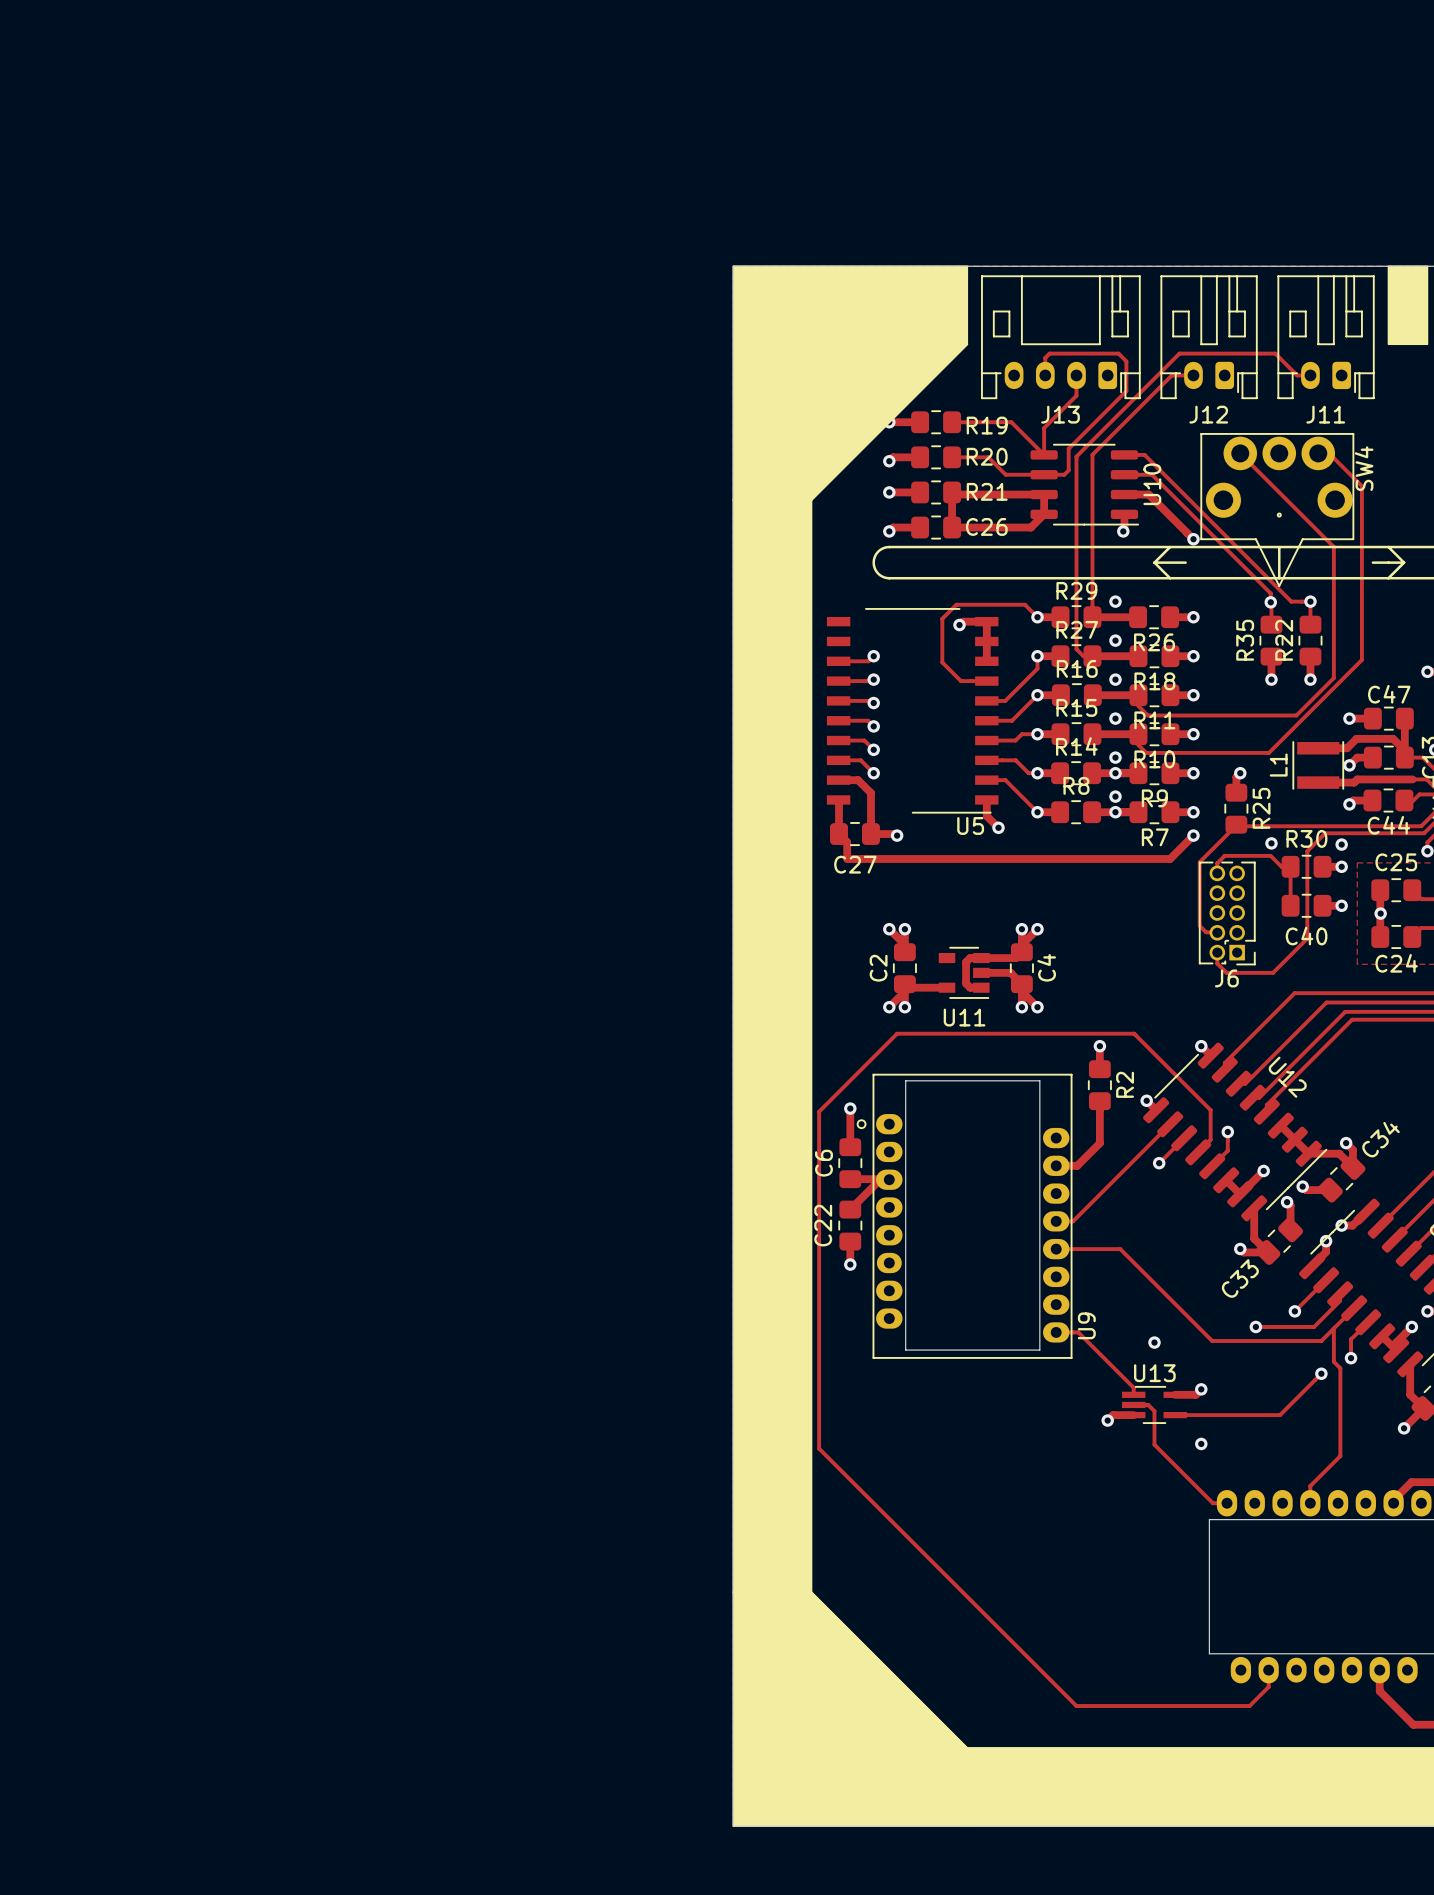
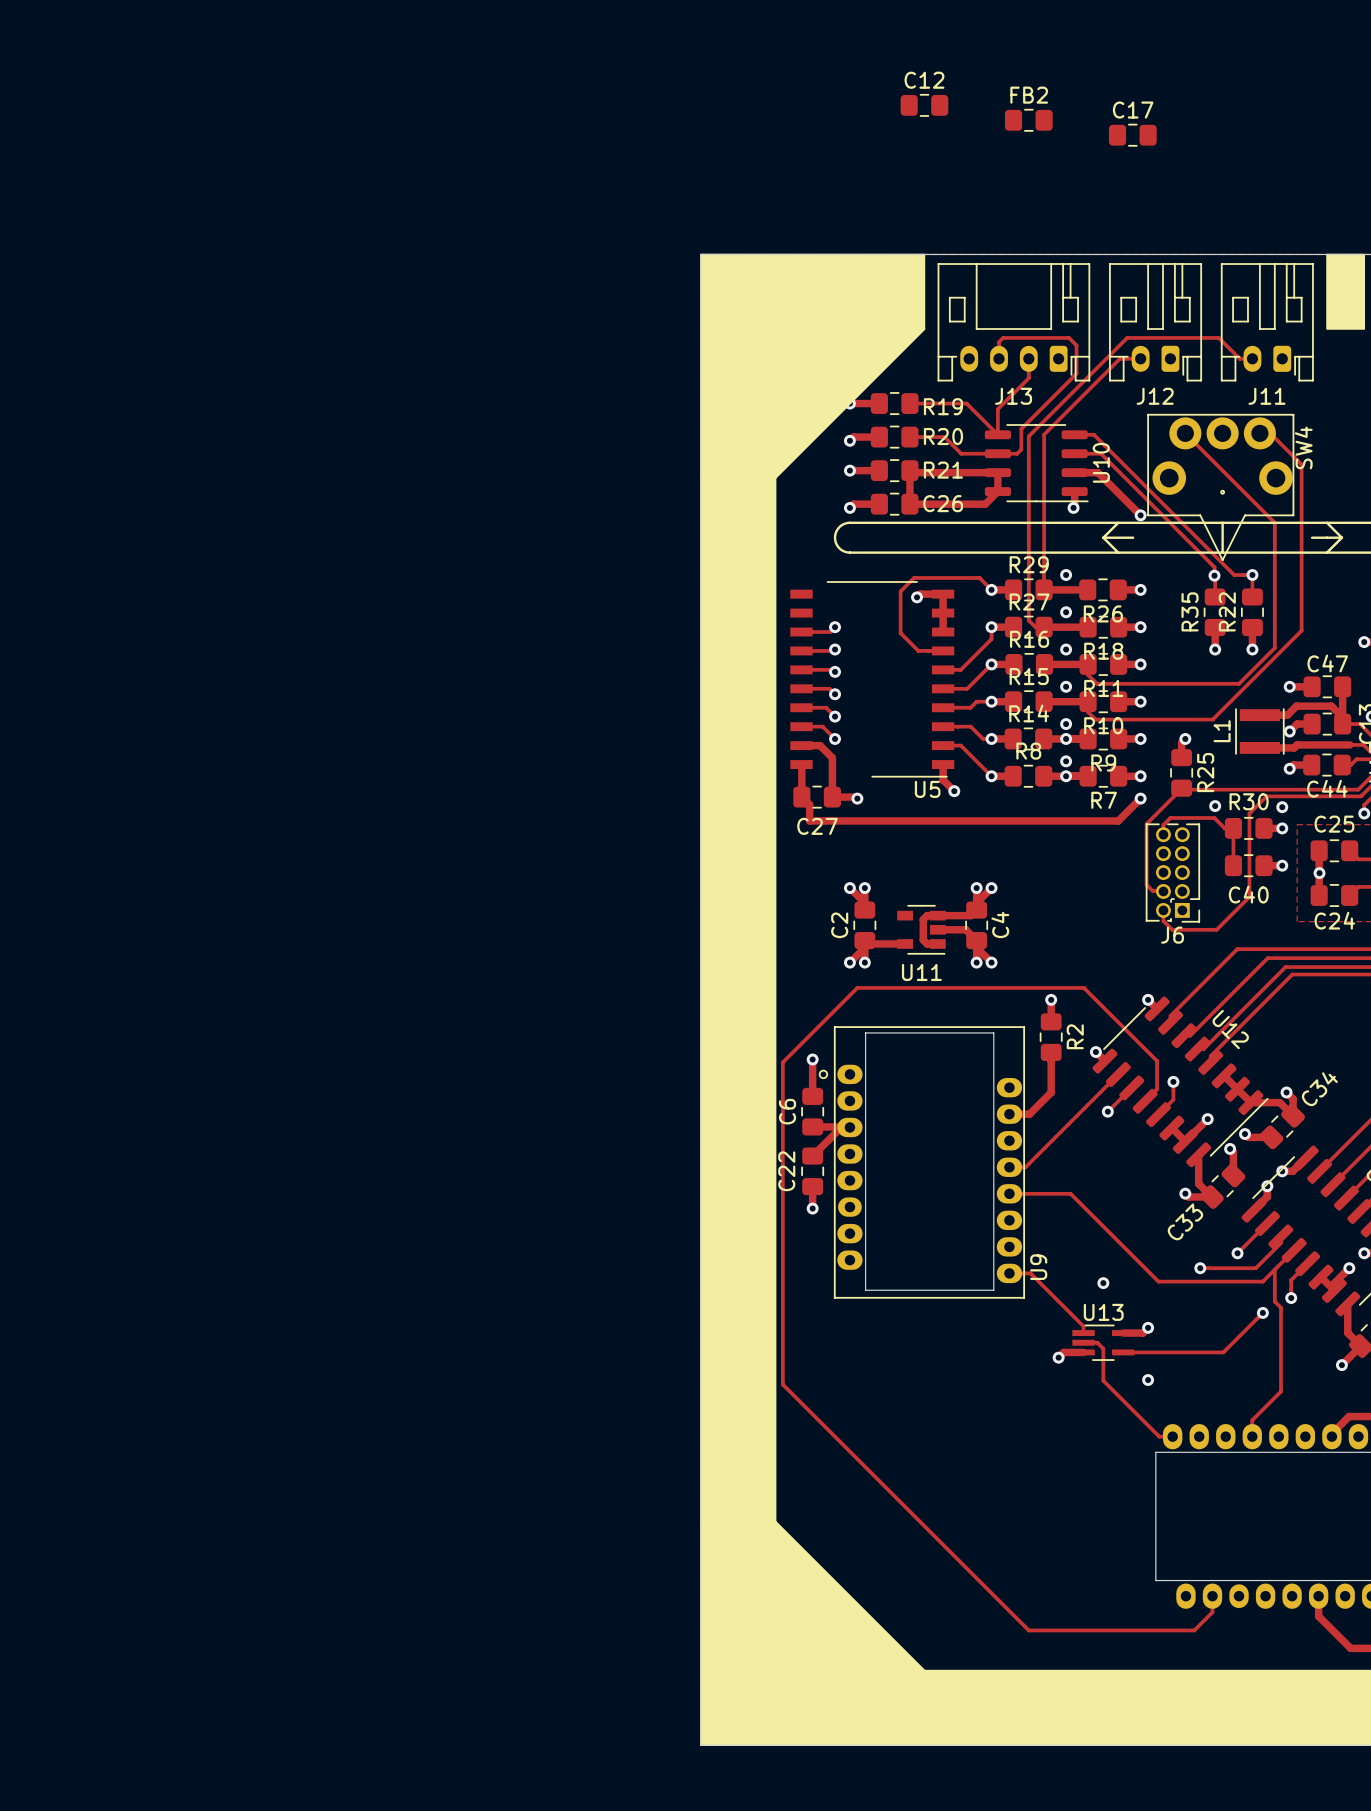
C12: none -> (924, 105)
FB2: none -> (1028, 120)
C17: none -> (1132, 135)

